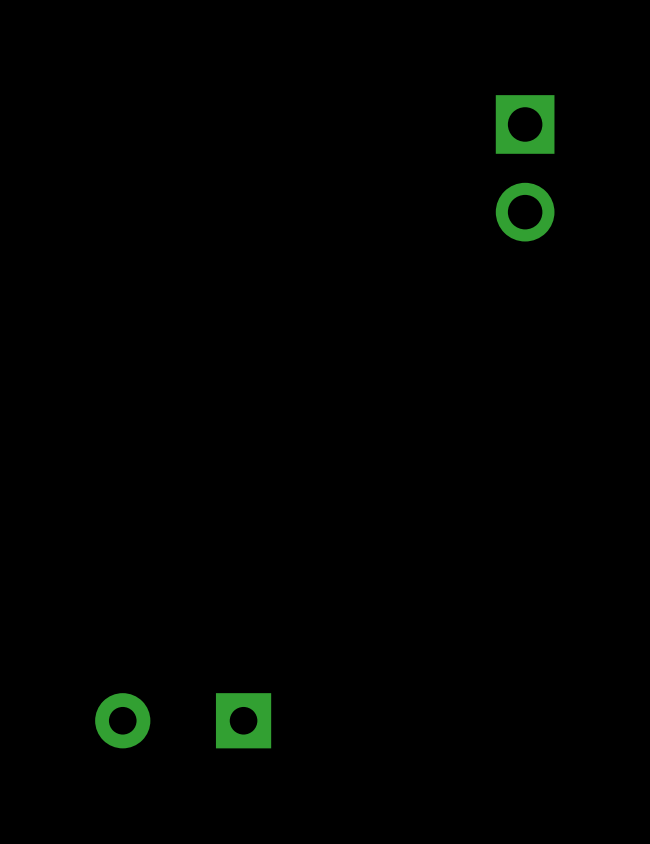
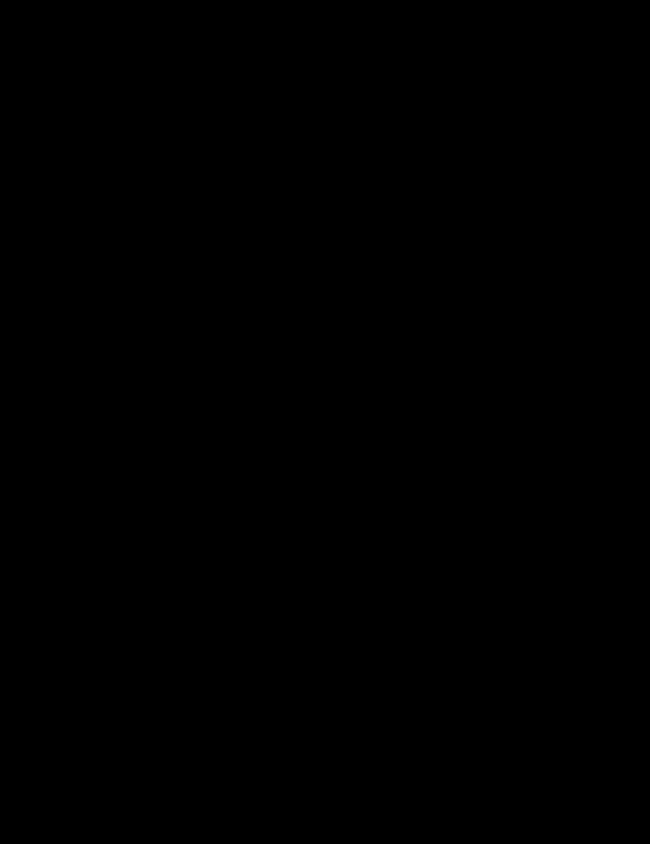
part: (525, 168) -> none
part: (183, 720) -> none

